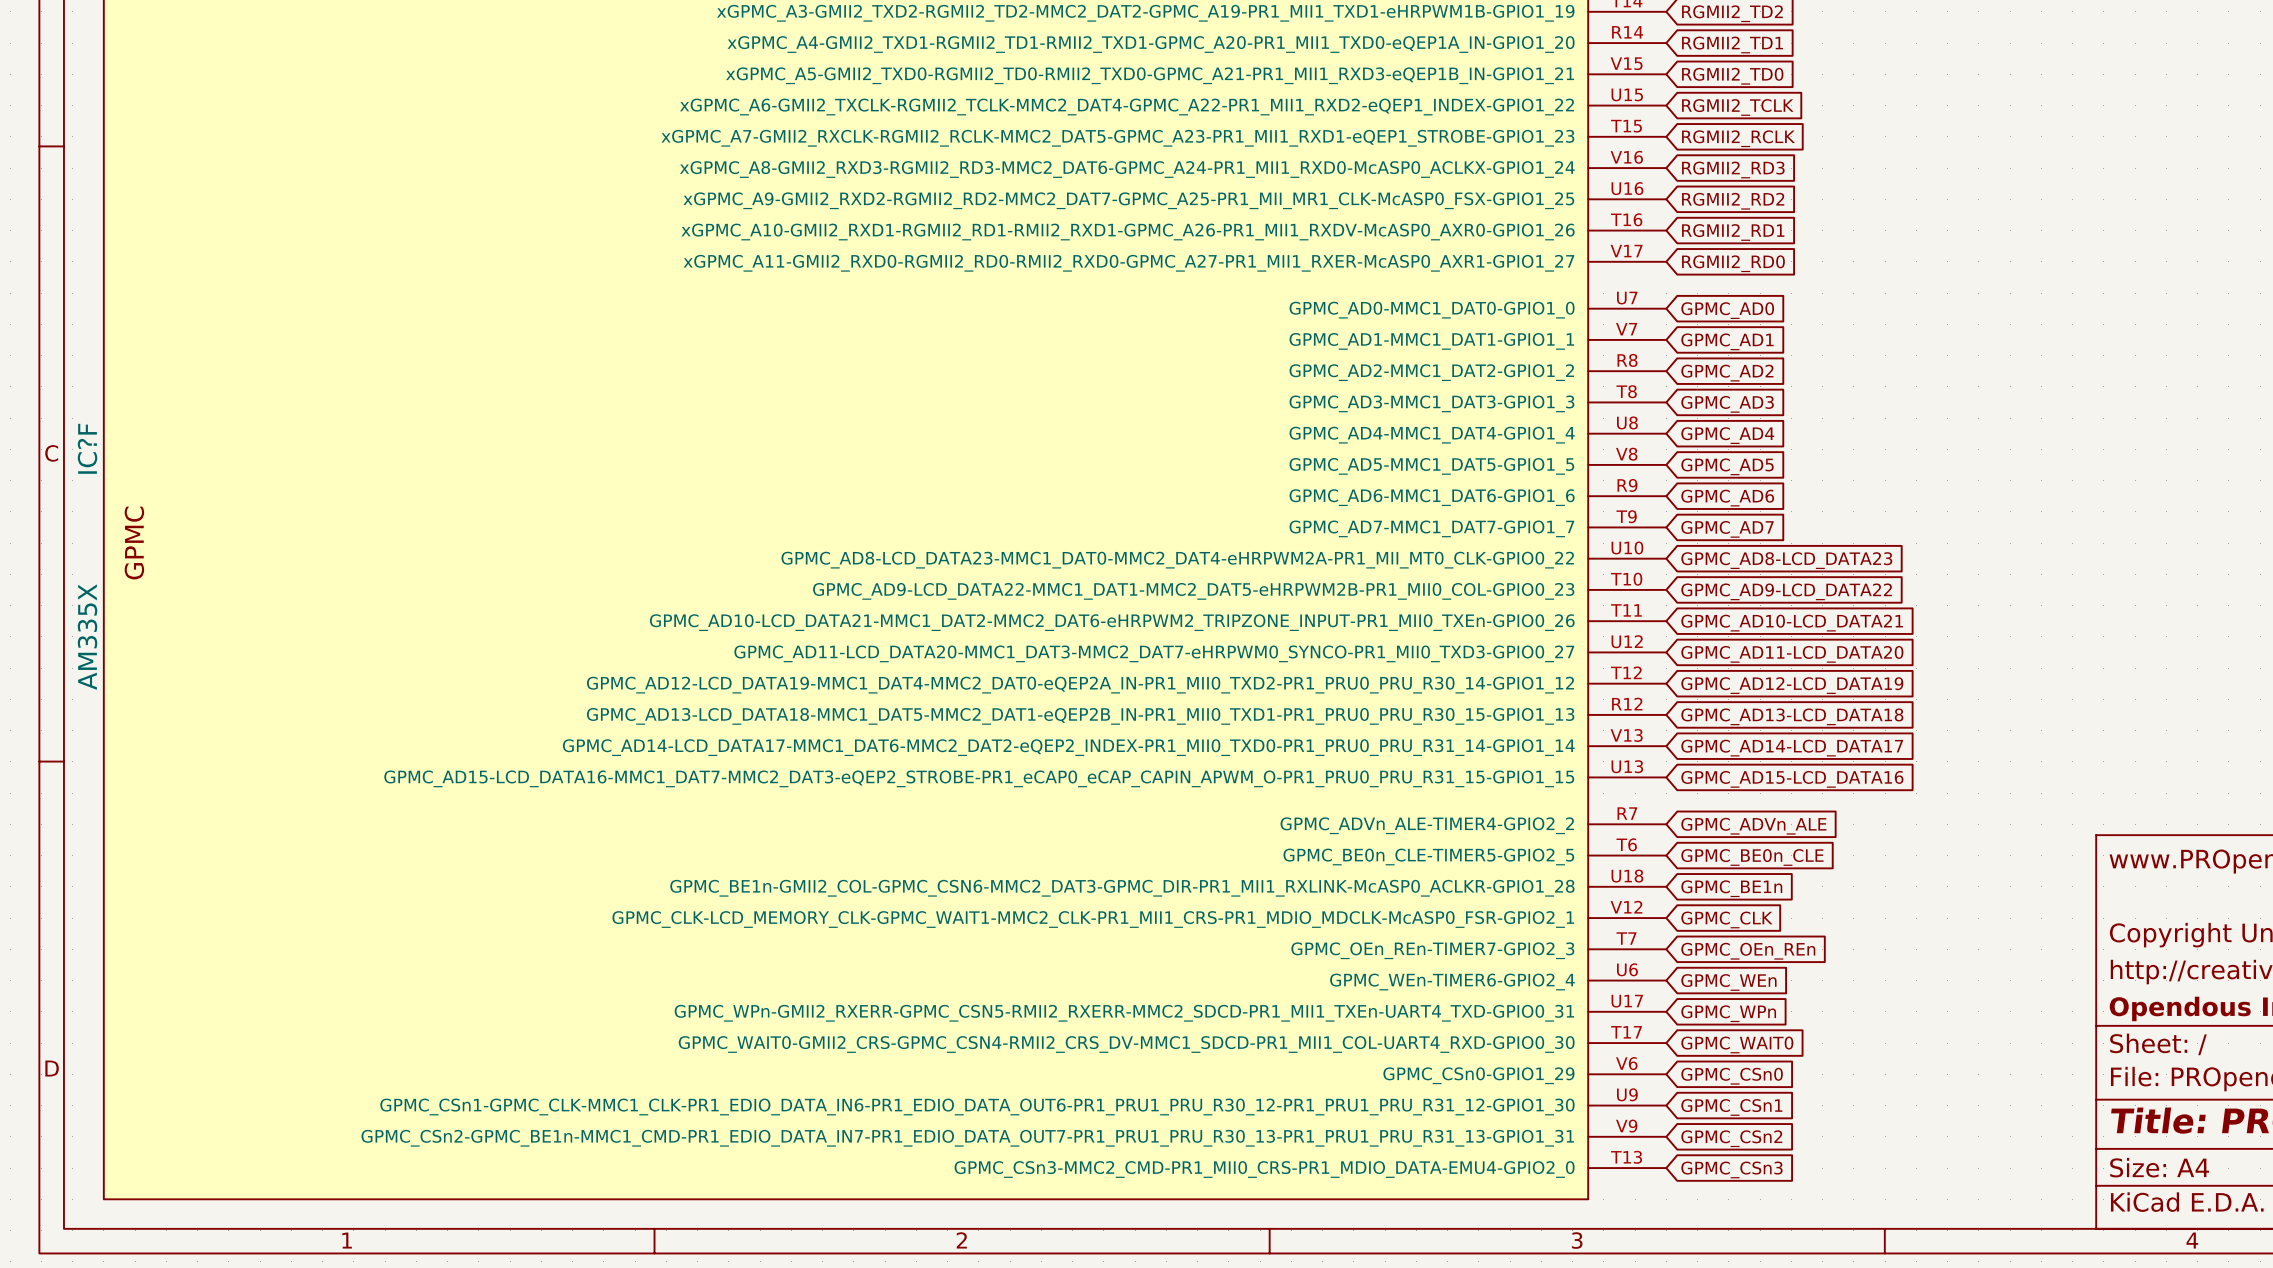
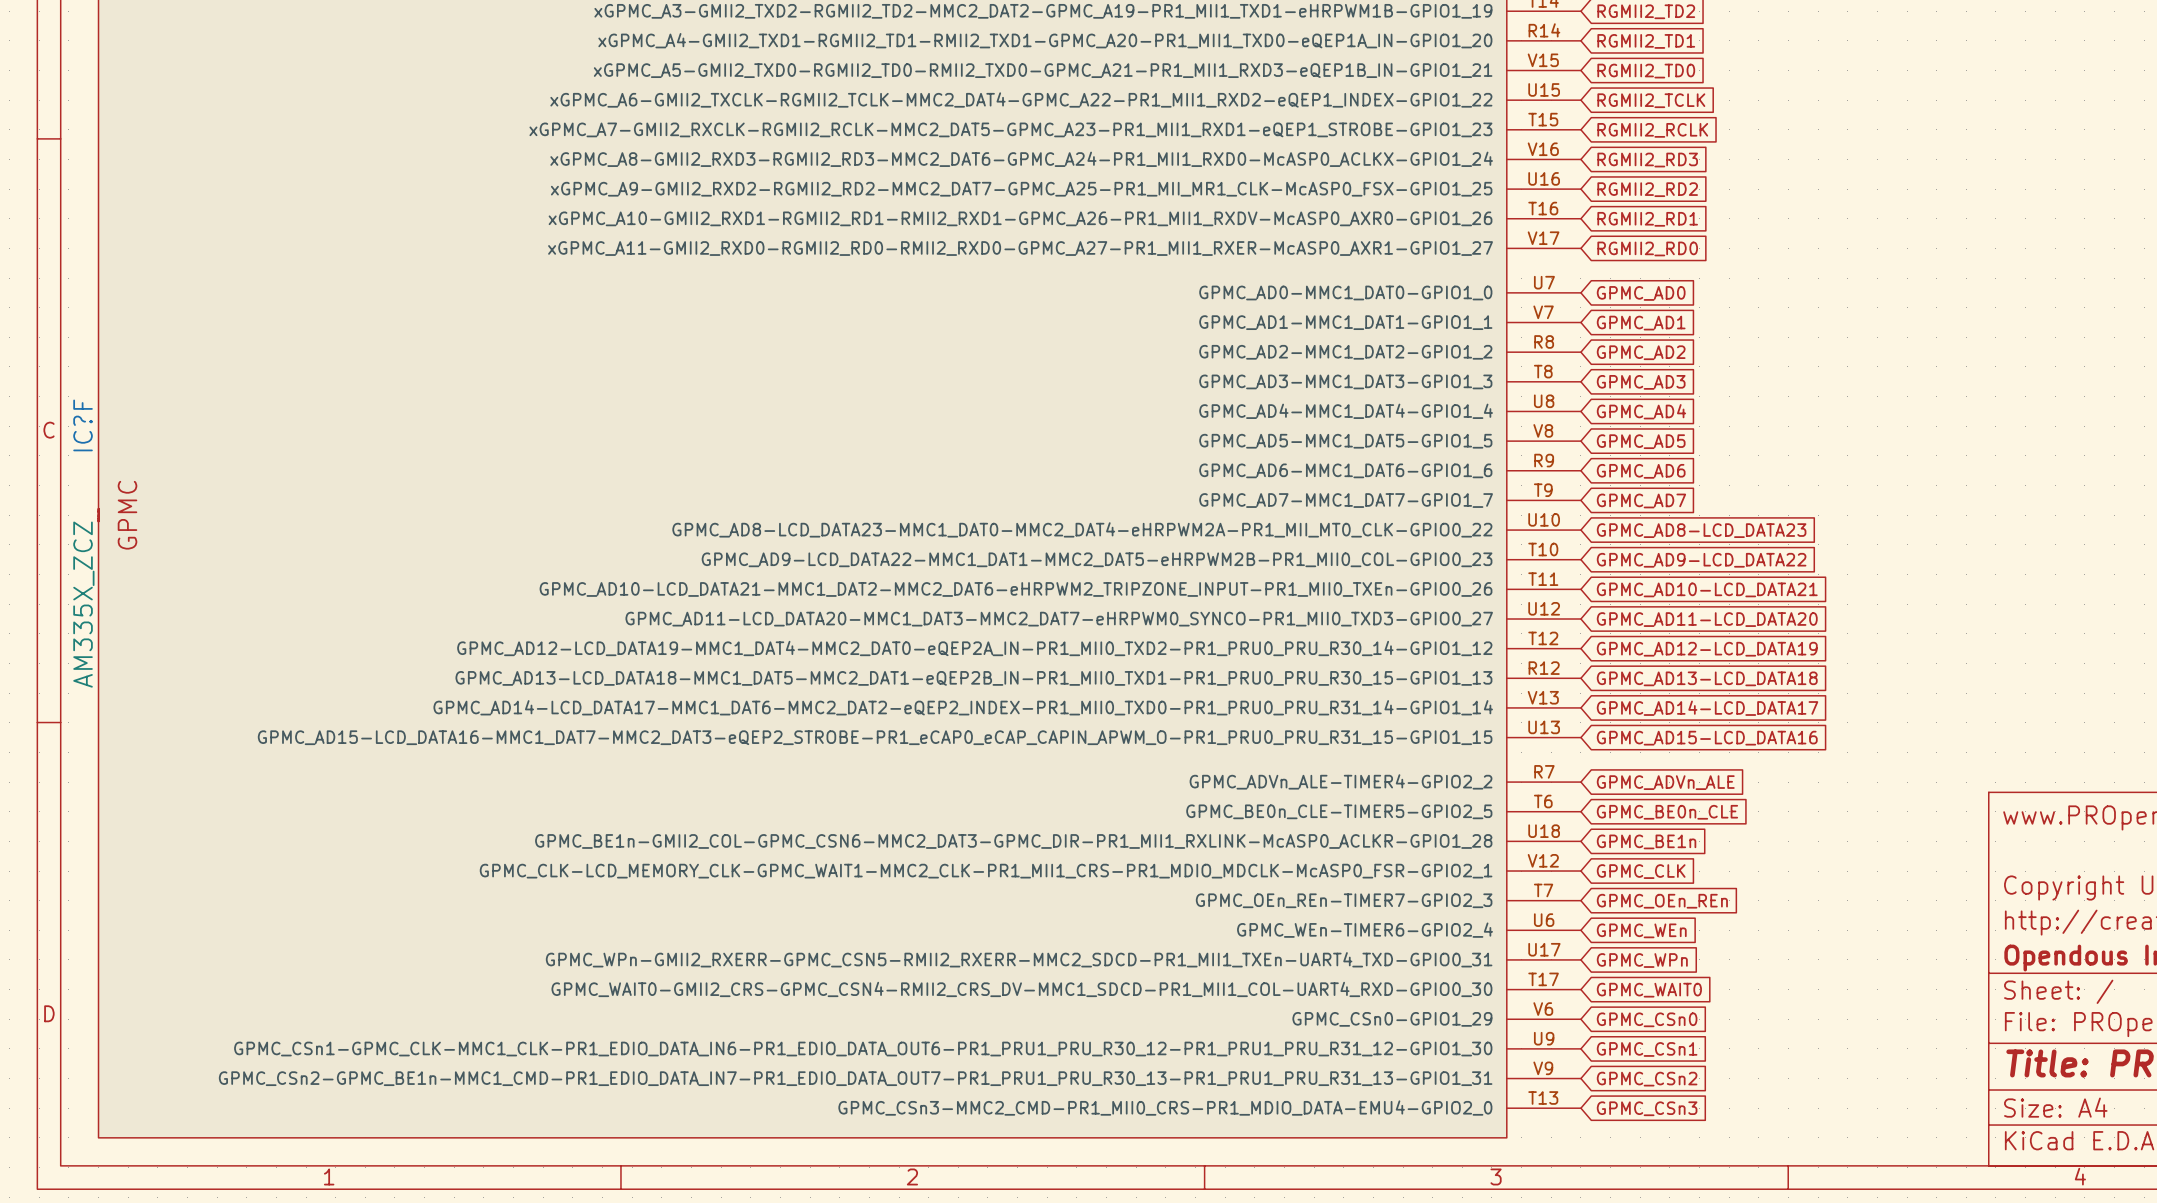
IC?F value: AM335X (87, 637) -> AM335X_ZCZ (83, 604)

